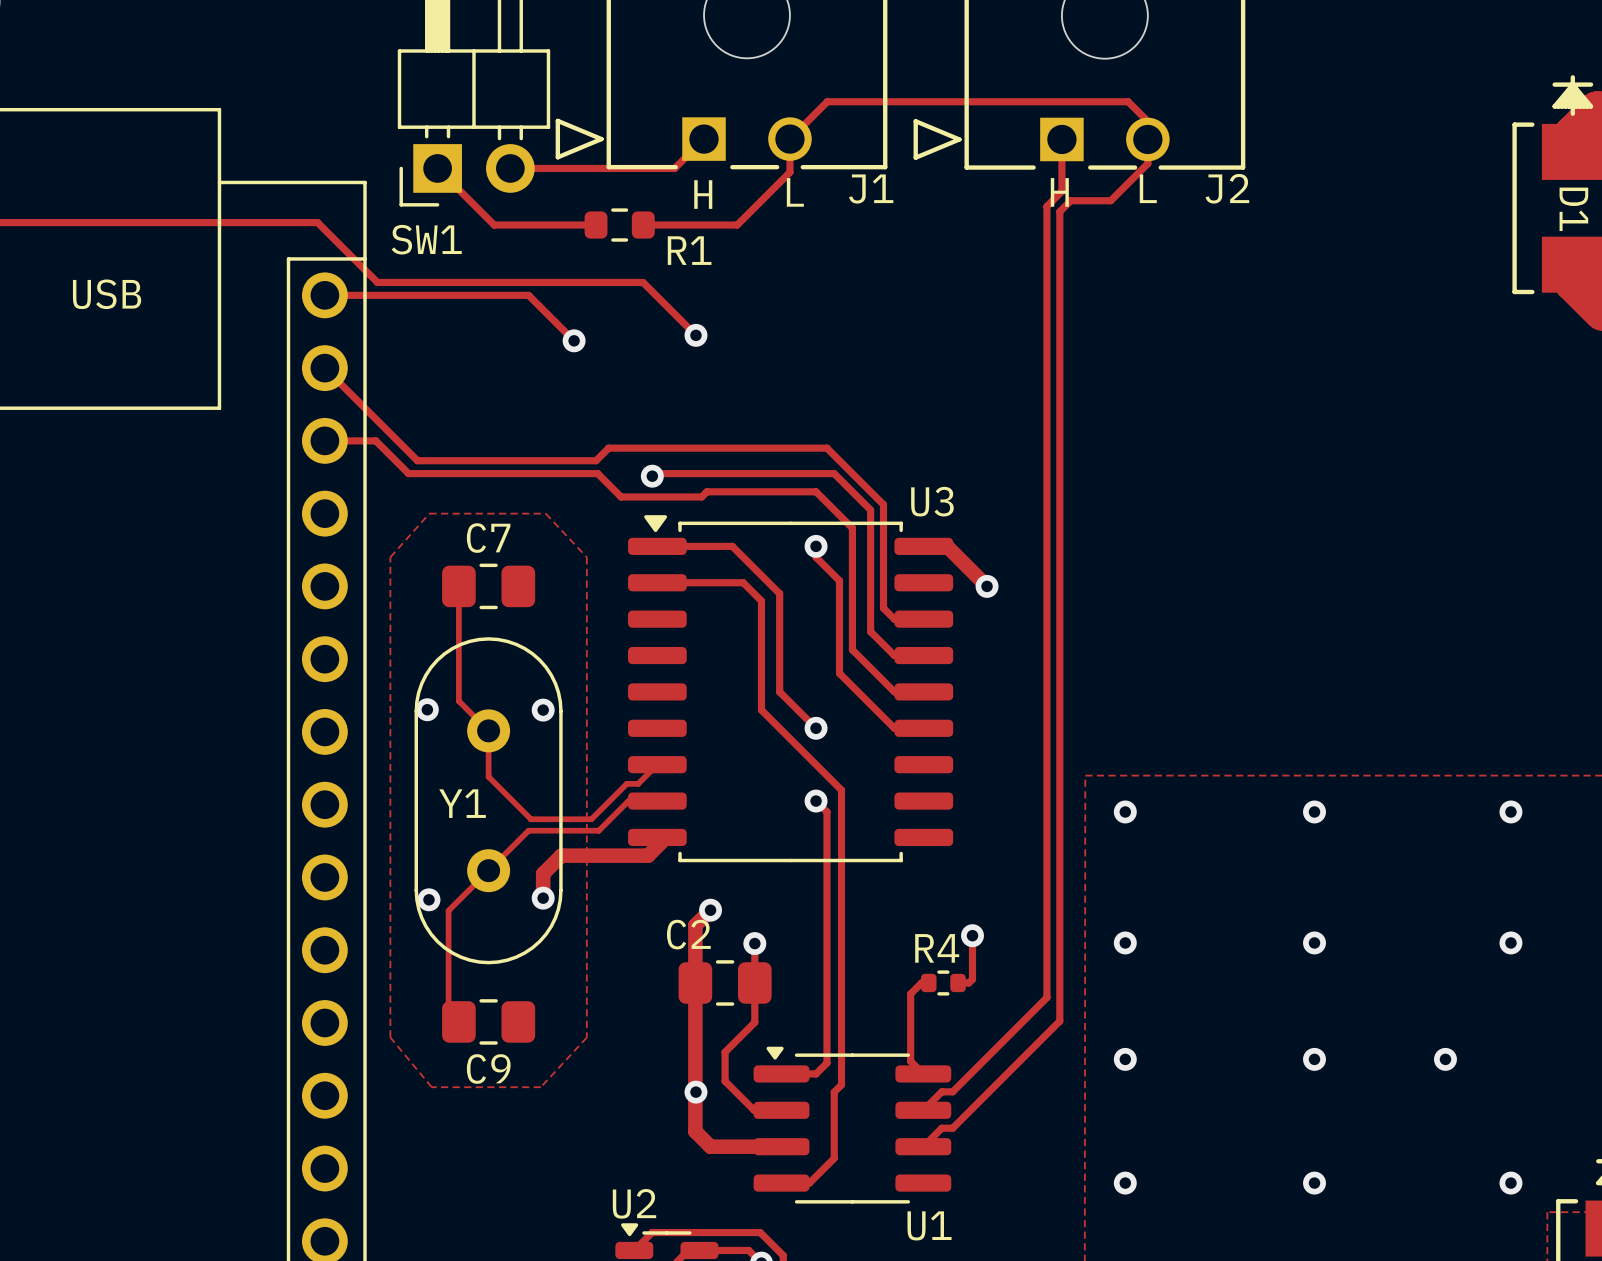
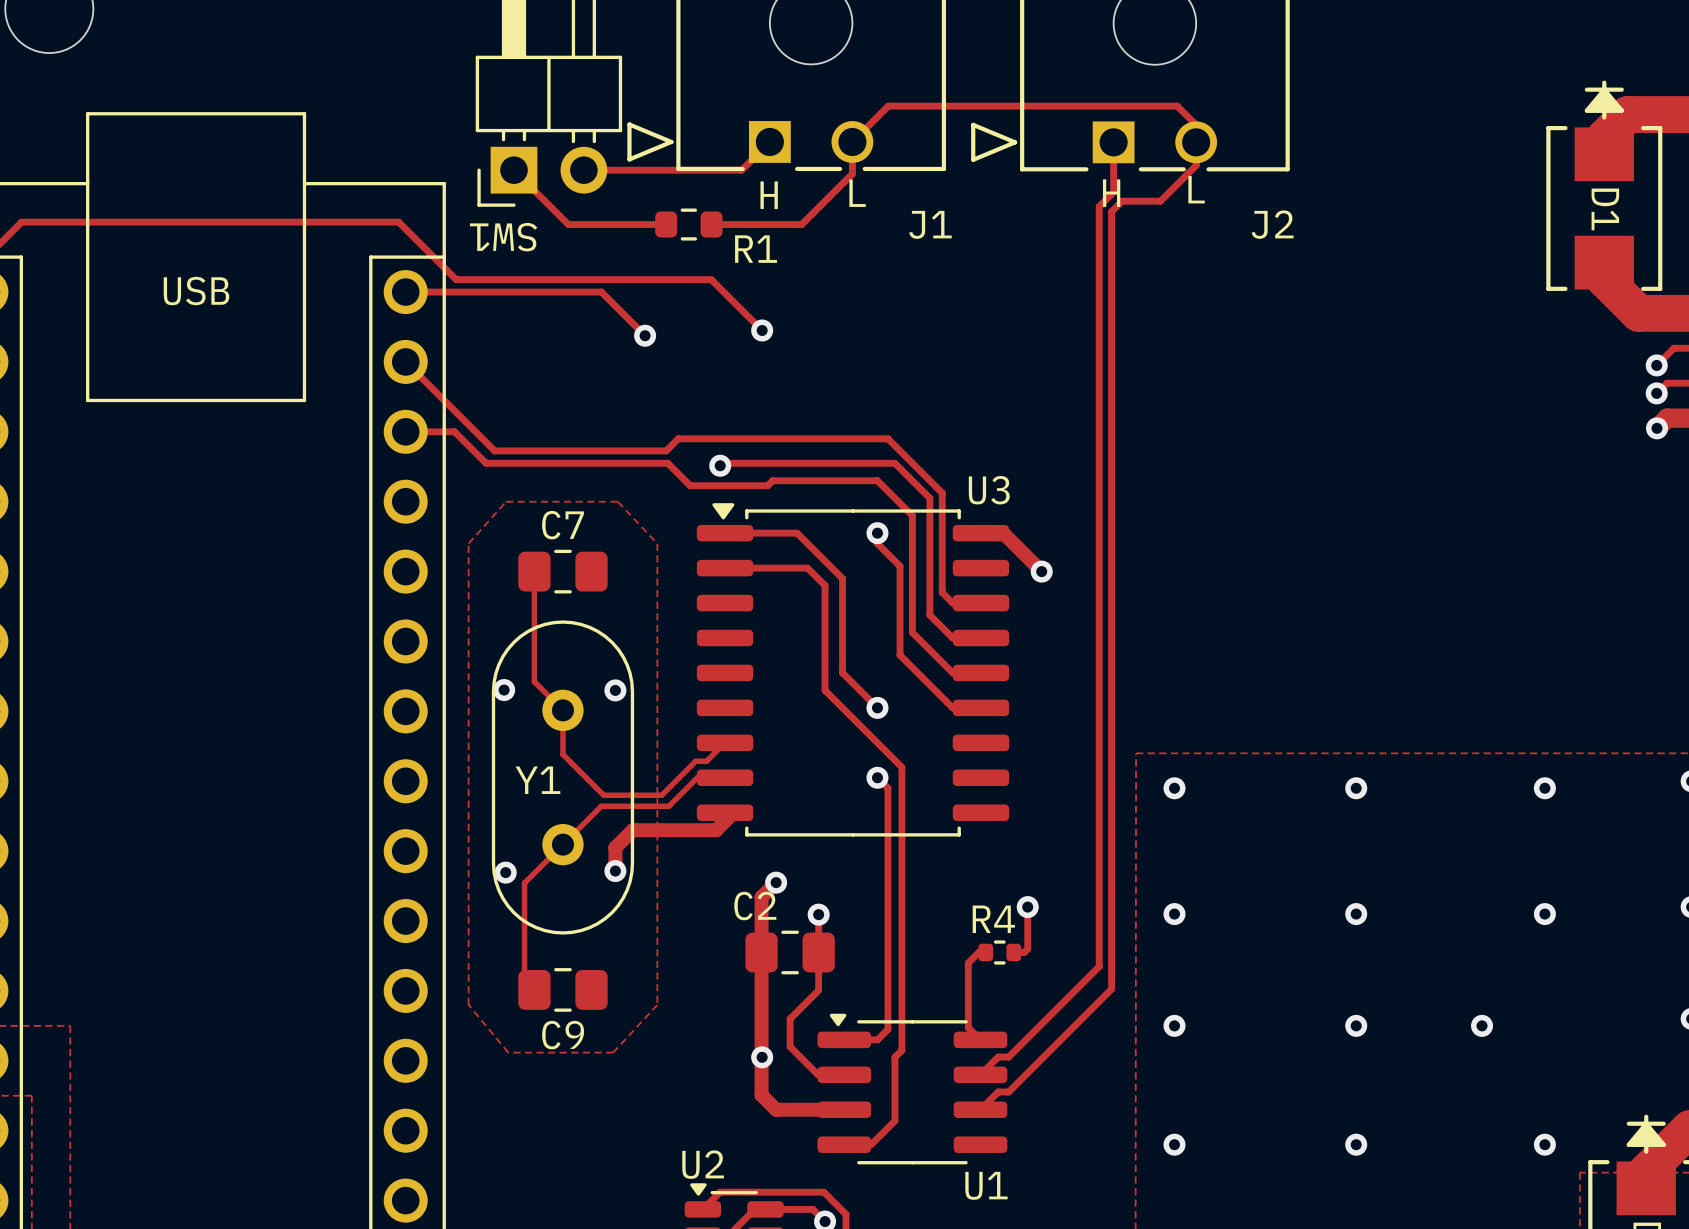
J2 name position: J2 (1227, 188) -> J2 (1272, 224)
J1 name position: J1 (871, 189) -> J1 (930, 224)
SW1 name rotation: 0° (426, 239) -> 180° (503, 237)

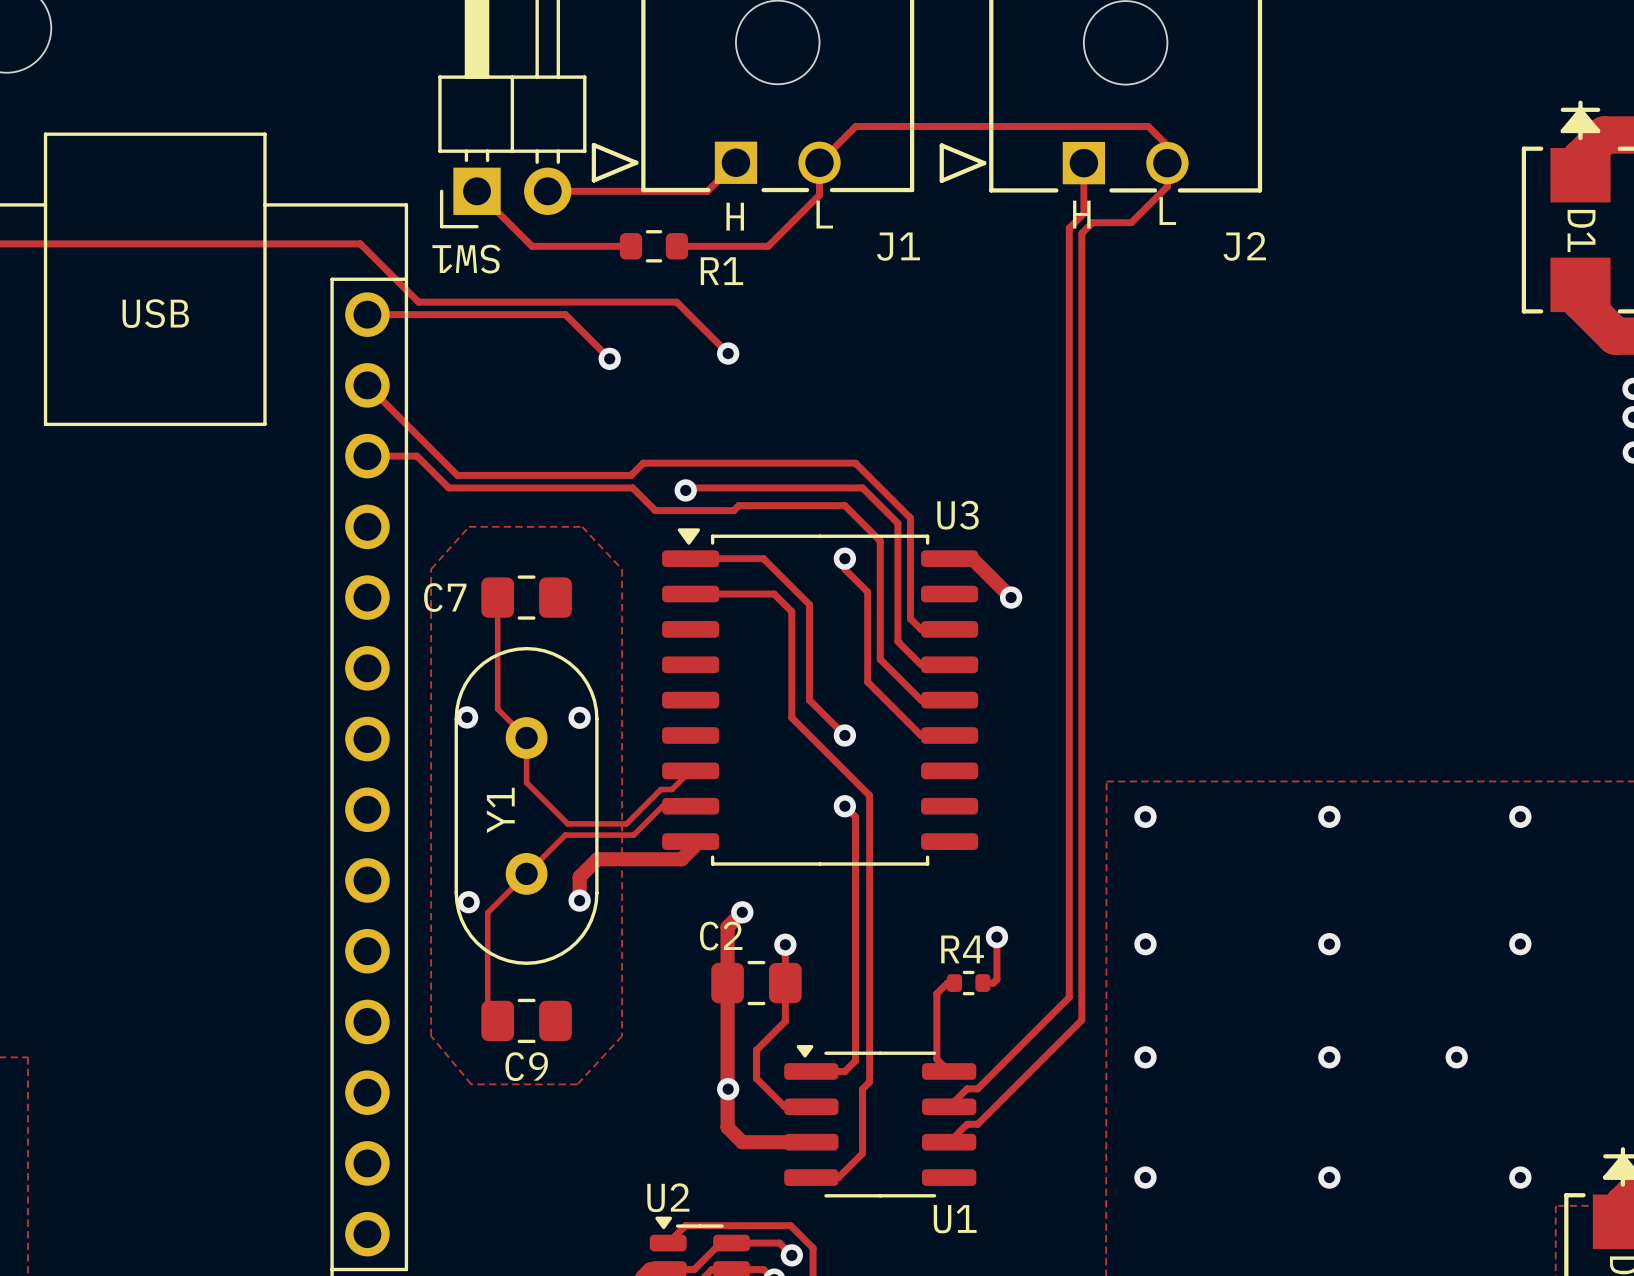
C7 name position: C7 (563, 525) -> C7 (445, 597)
Y1 name rotation: 0° (537, 780) -> 90° counterclockwise (500, 810)

